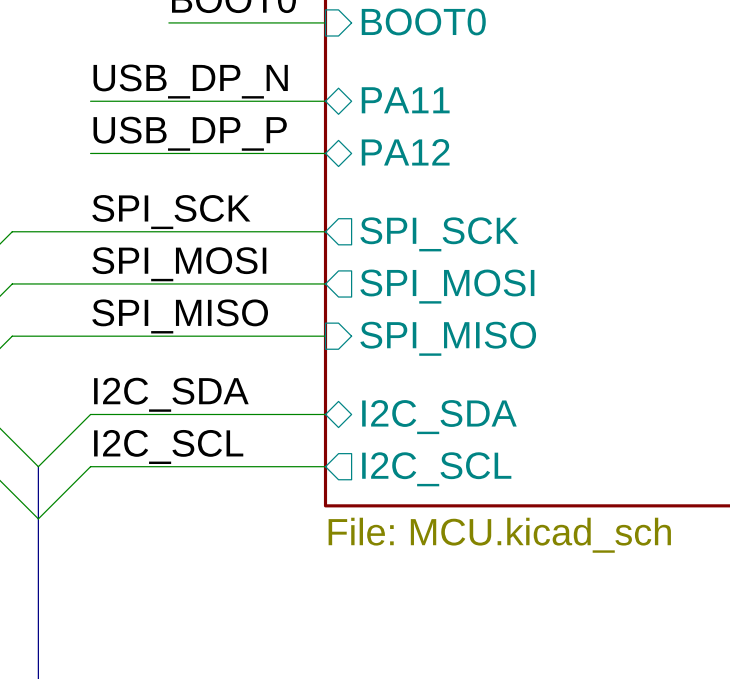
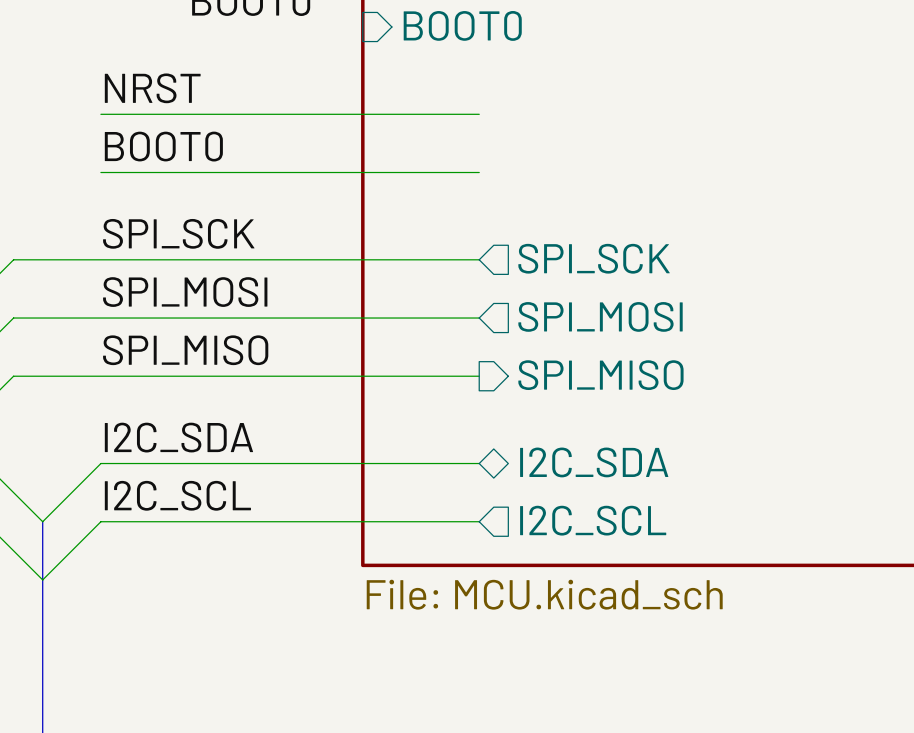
wire: (168, 22) (325, 22) -> none
label: USB_DP_N (190, 81) -> NRST (152, 88)
sheet pin: PA11 (405, 100) -> none
wire: none -> (362, 114) (479, 114)
label: USB_DP_P (190, 133) -> BOOT0 (163, 146)
sheet pin: PA12 (405, 152) -> none
wire: none -> (362, 172) (479, 172)
wire: none -> (362, 259) (479, 259)
sheet pin position: SPI_SCK (439, 234) -> SPI_SCK (594, 258)
wire: none -> (362, 318) (479, 318)
sheet pin position: SPI_MOSI (447, 286) -> SPI_MOSI (600, 316)
wire: none -> (362, 376) (479, 376)
sheet pin position: SPI_MISO (448, 338) -> SPI_MISO (600, 375)
wire: none -> (362, 463) (479, 463)
sheet pin position: I2C_SDA (439, 417) -> I2C_SDA (594, 462)
wire: none -> (362, 521) (479, 521)
sheet pin position: I2C_SCL (436, 469) -> I2C_SCL (593, 520)

